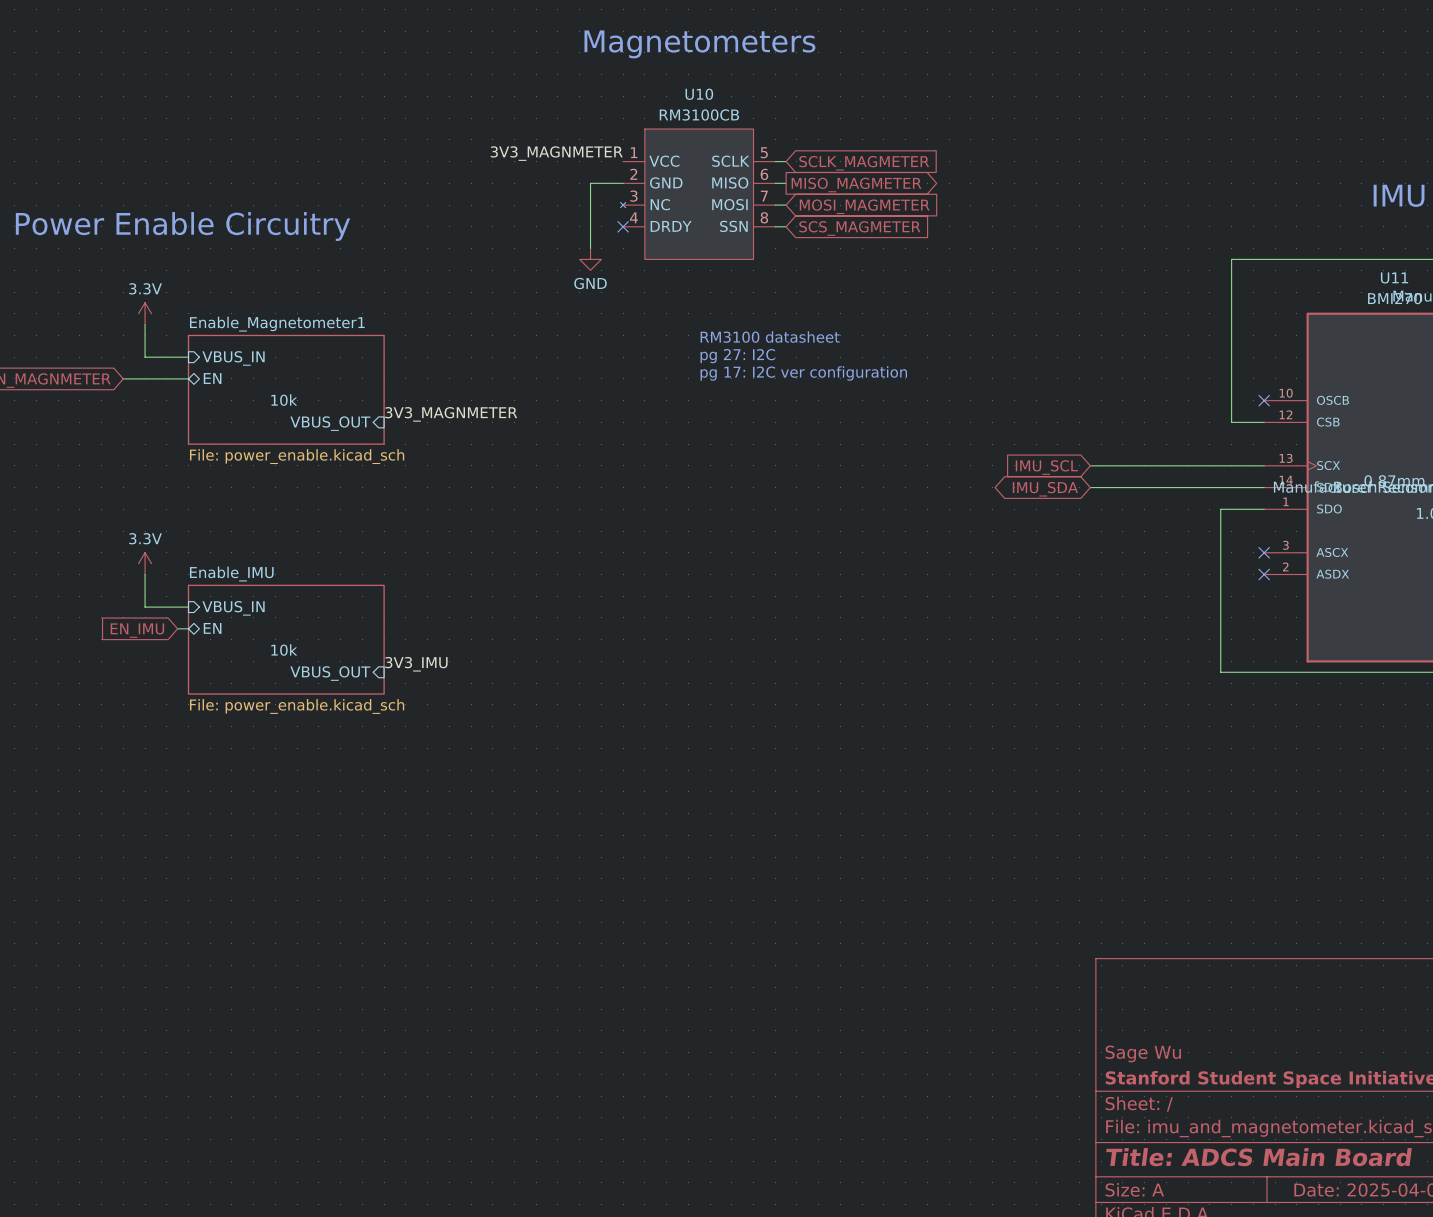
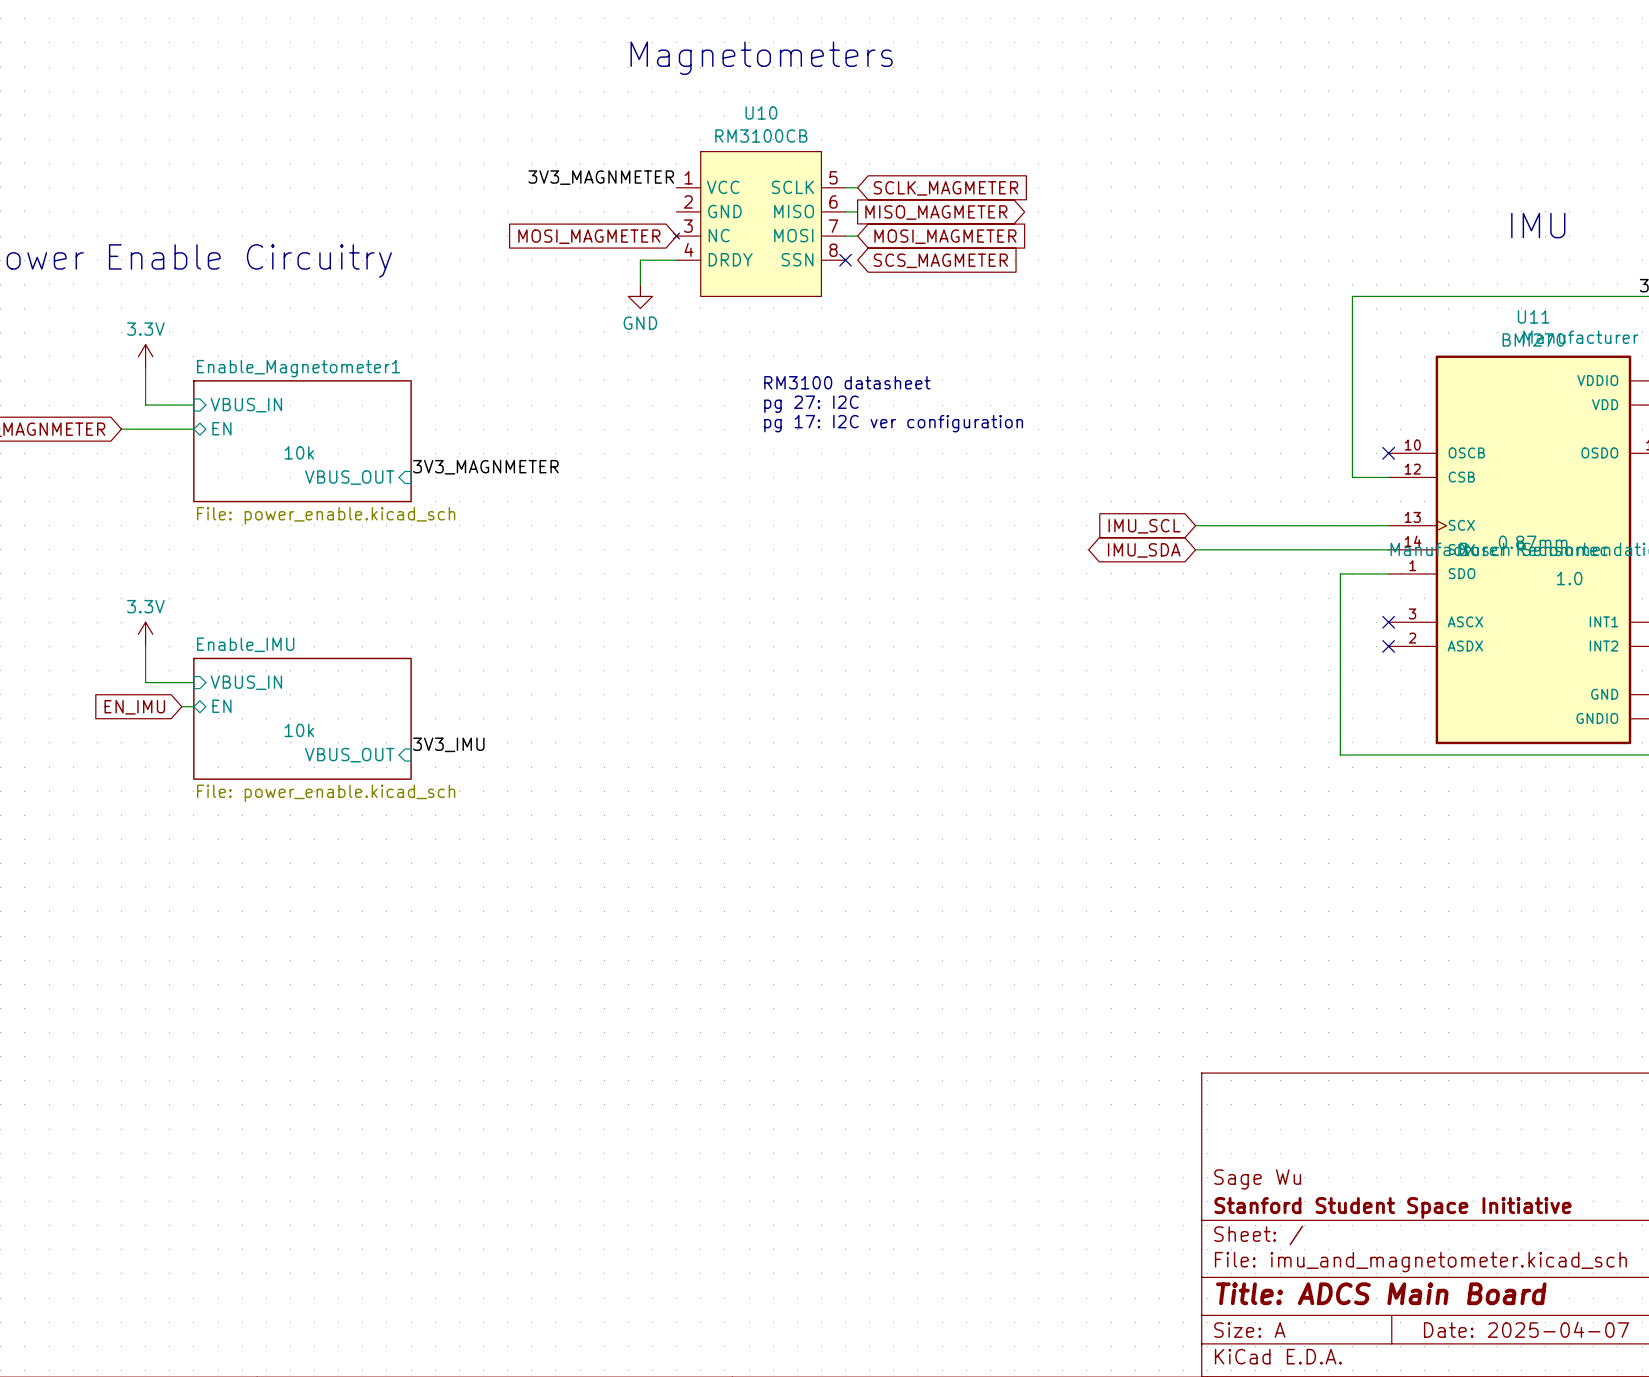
wire: (623, 183) (590, 183) (590, 226) -> (676, 260) (640, 260)
global label: none -> MOSI_MAGMETER (589, 236)
no-connect mark: (623, 226) -> none
wire: (775, 226) (786, 226) -> none
no-connect mark: none -> (845, 260)

